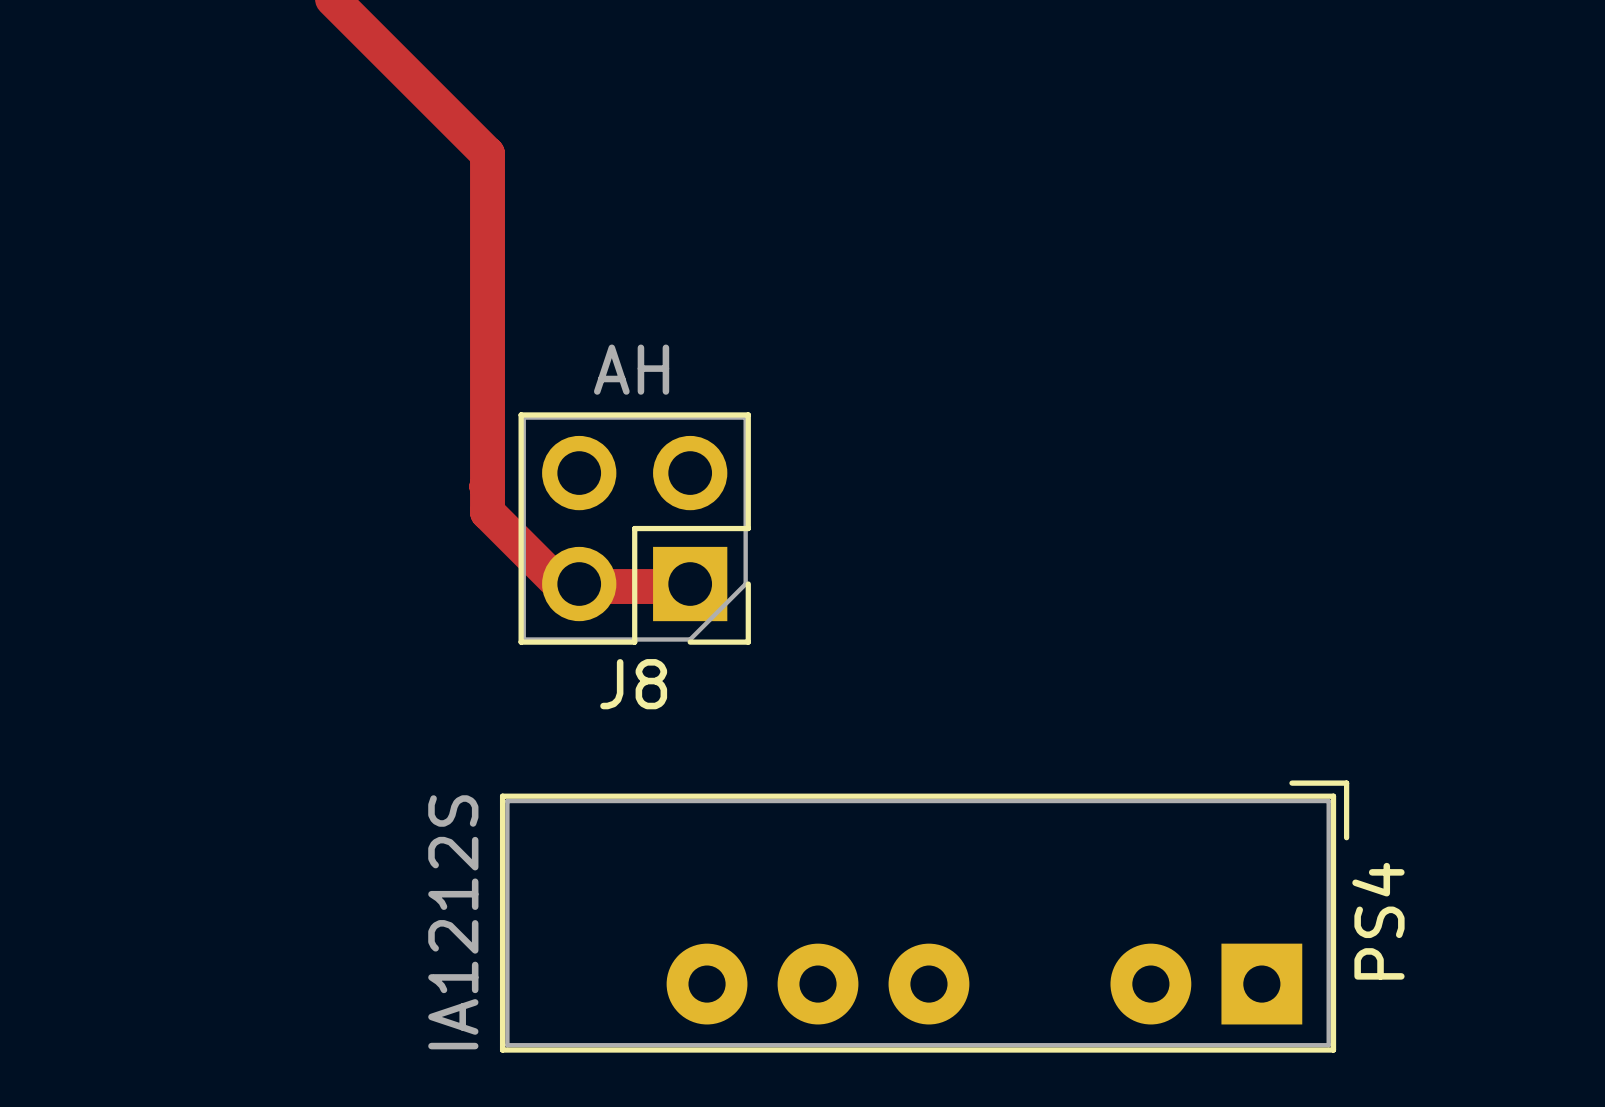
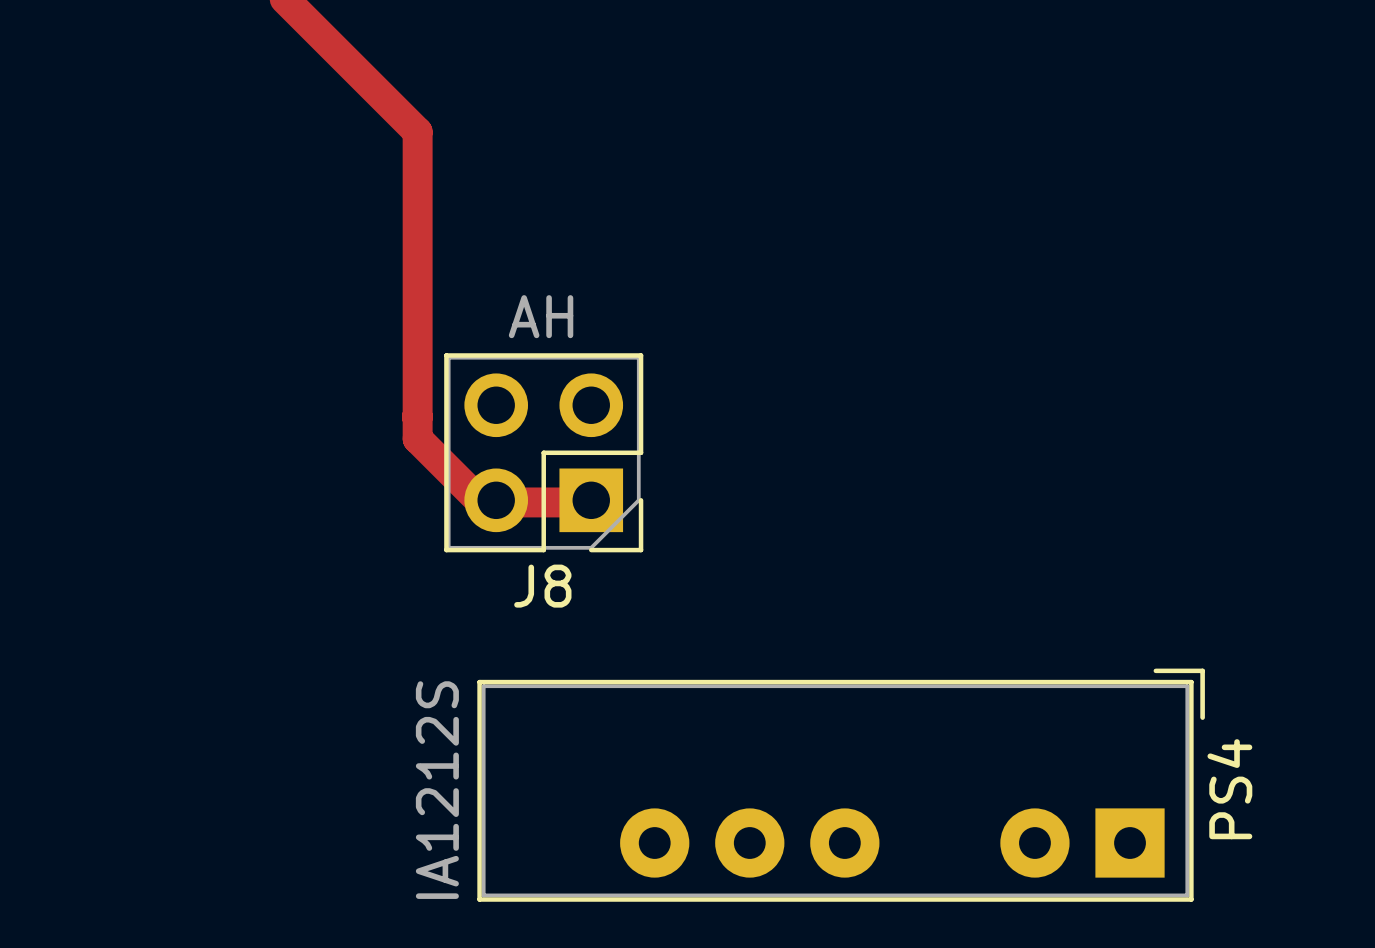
PS4 position: (924, 916) -> (841, 785)

